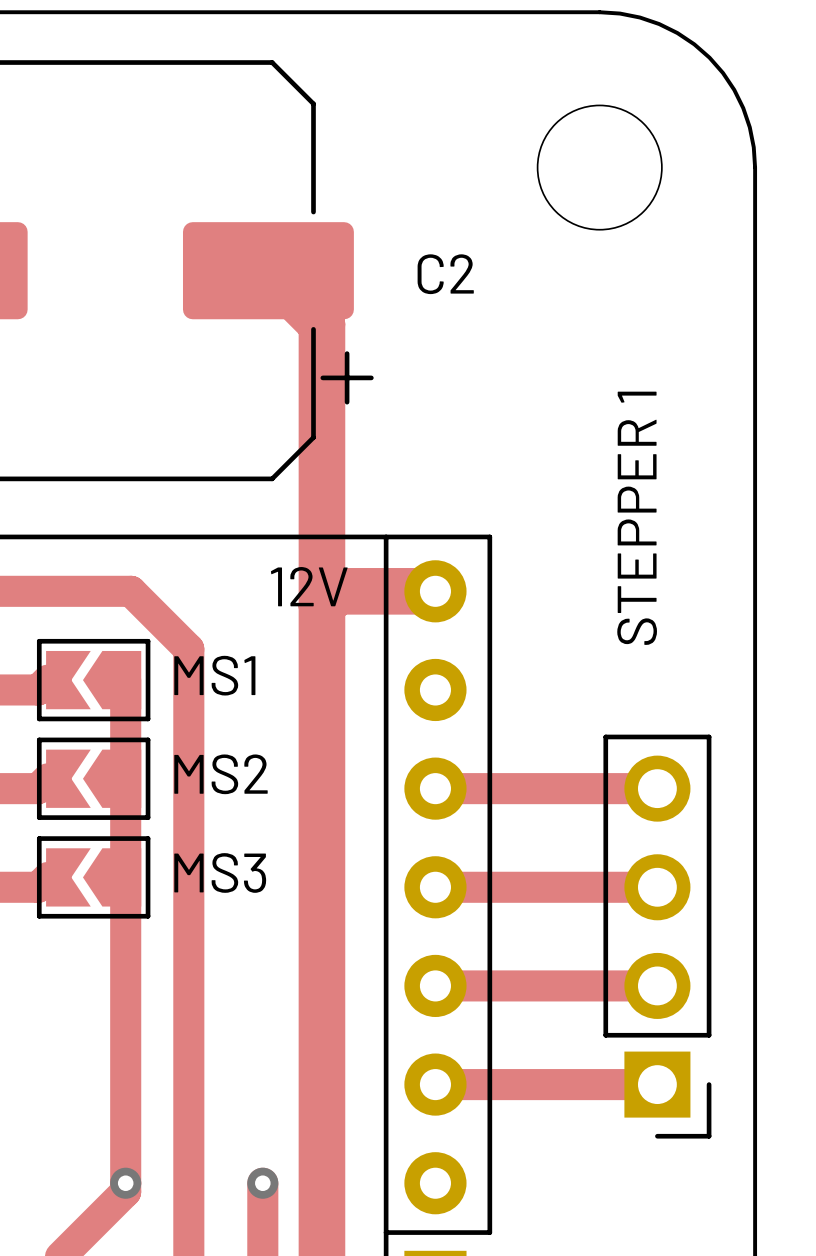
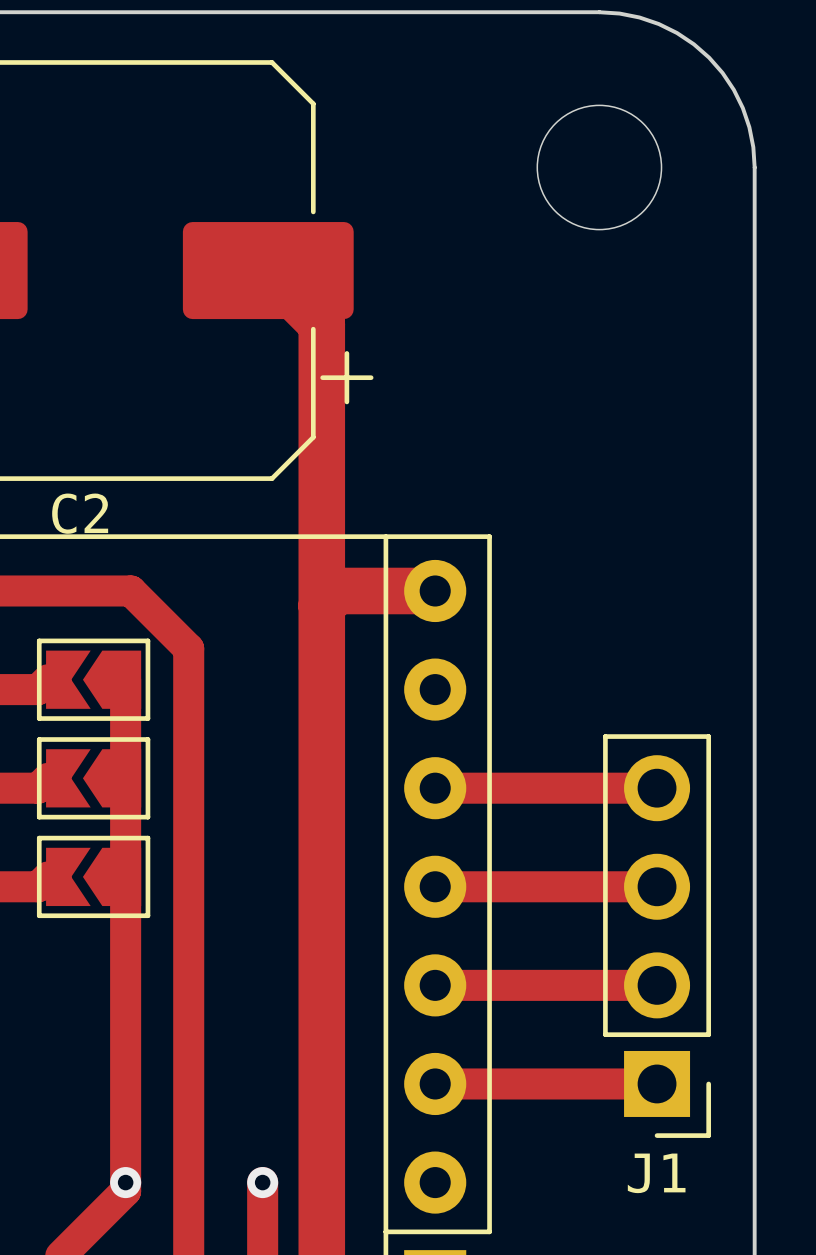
C2 name position: C2 (445, 274) -> C2 (80, 513)
STEPPER 1 name: STEPPER 1 (637, 518) -> J1 (656, 1173)
text: 12V (309, 586) -> none
text: MS1 (214, 675) -> none
text: MS2 (220, 774) -> none
text: MS3 (220, 872) -> none

